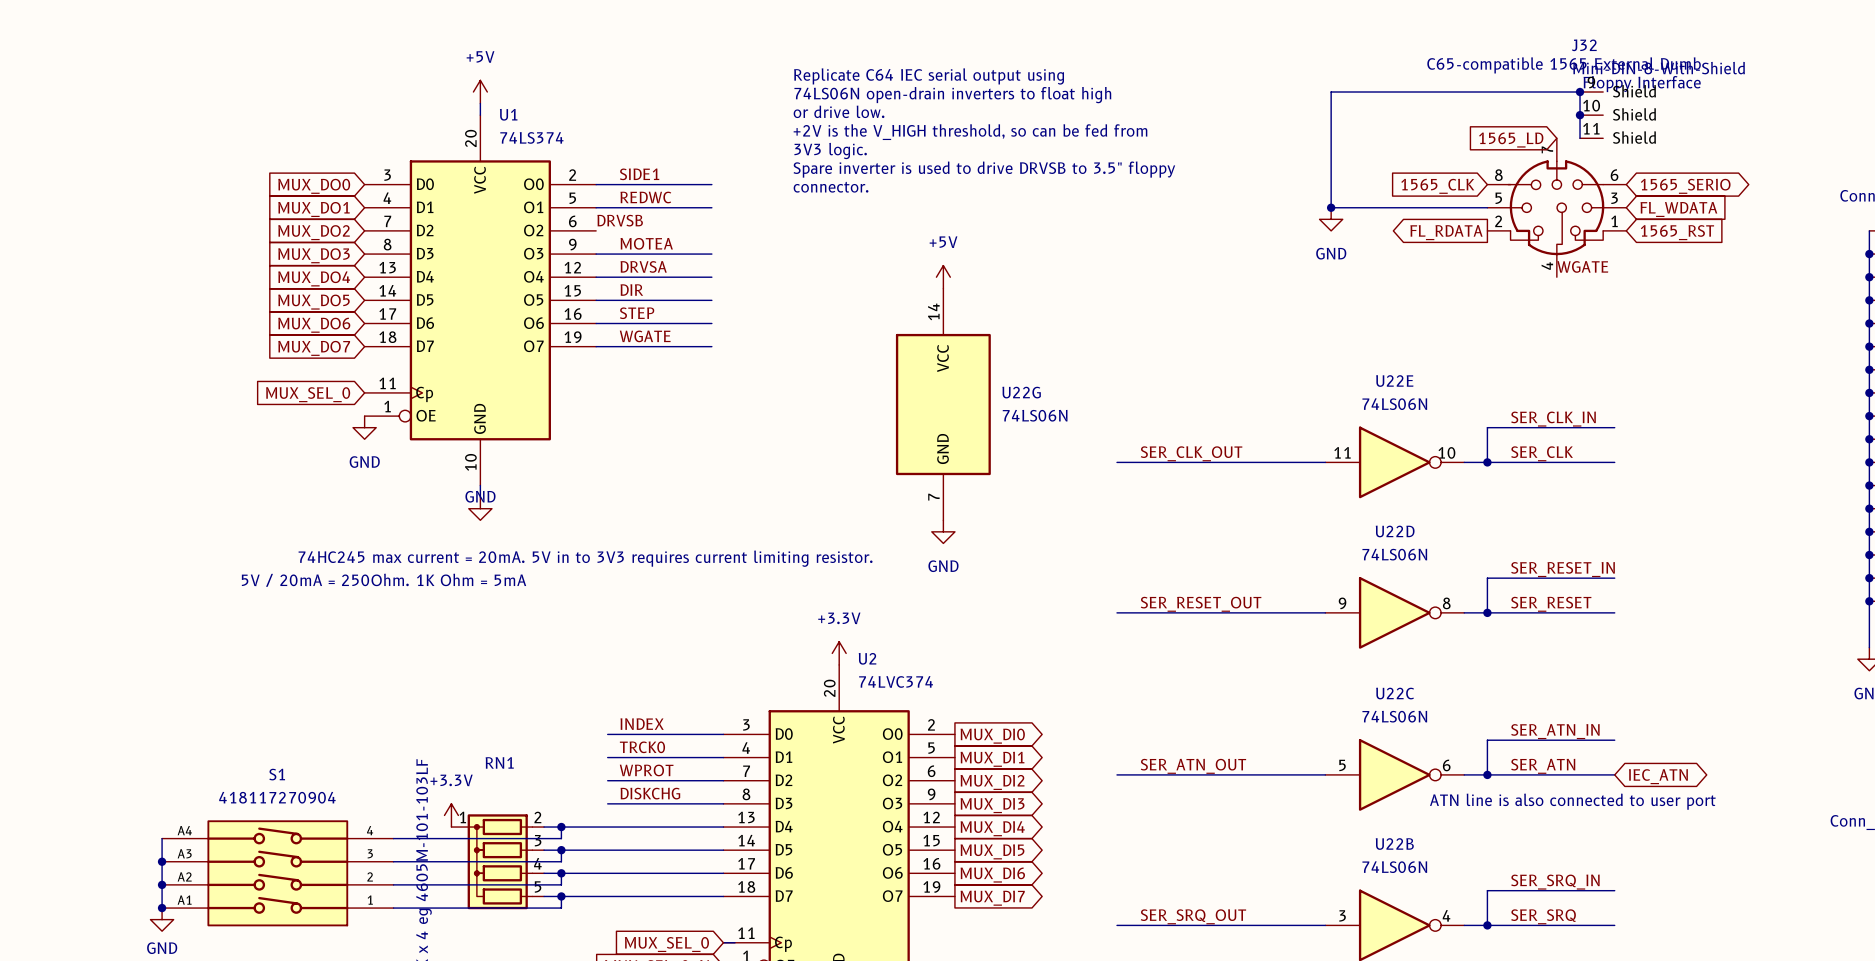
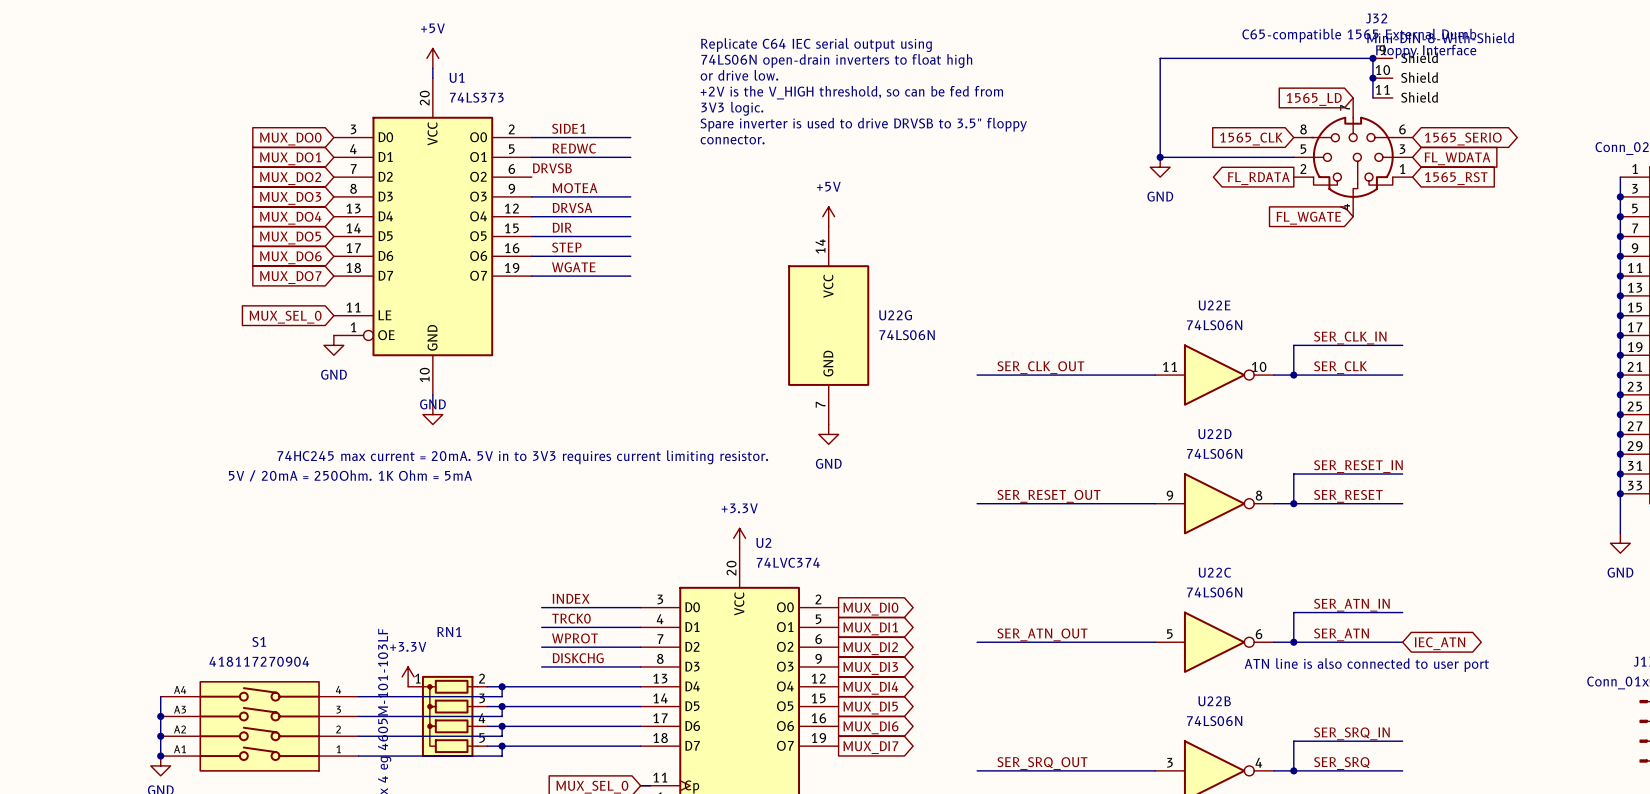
U1 symbol: [364, 115, 597, 486] -> [333, 78, 532, 395]
U1 value: 74LS374 (531, 137) -> 74LS373 (476, 97)
label: WGATE (1582, 266) -> none
global label: none -> FL_WGATE (1308, 218)

